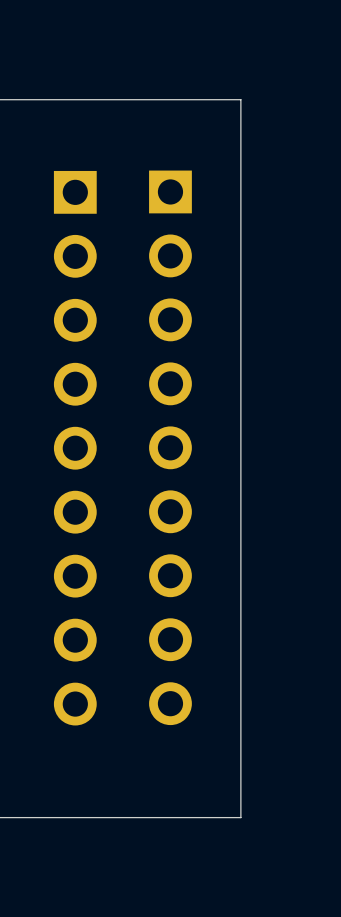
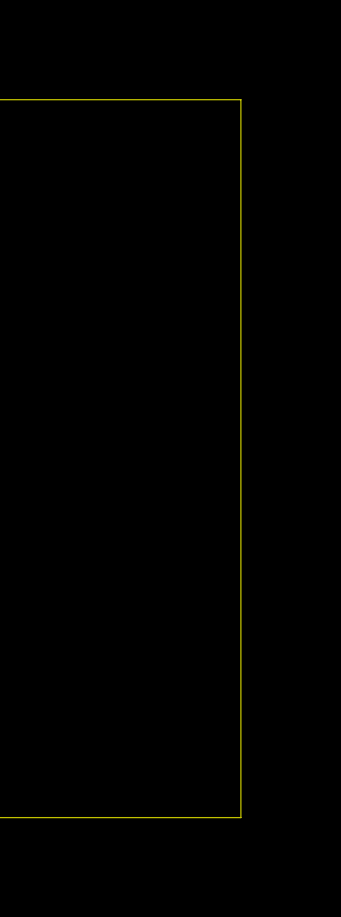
part: (170, 447) -> none
part: (75, 448) -> none

